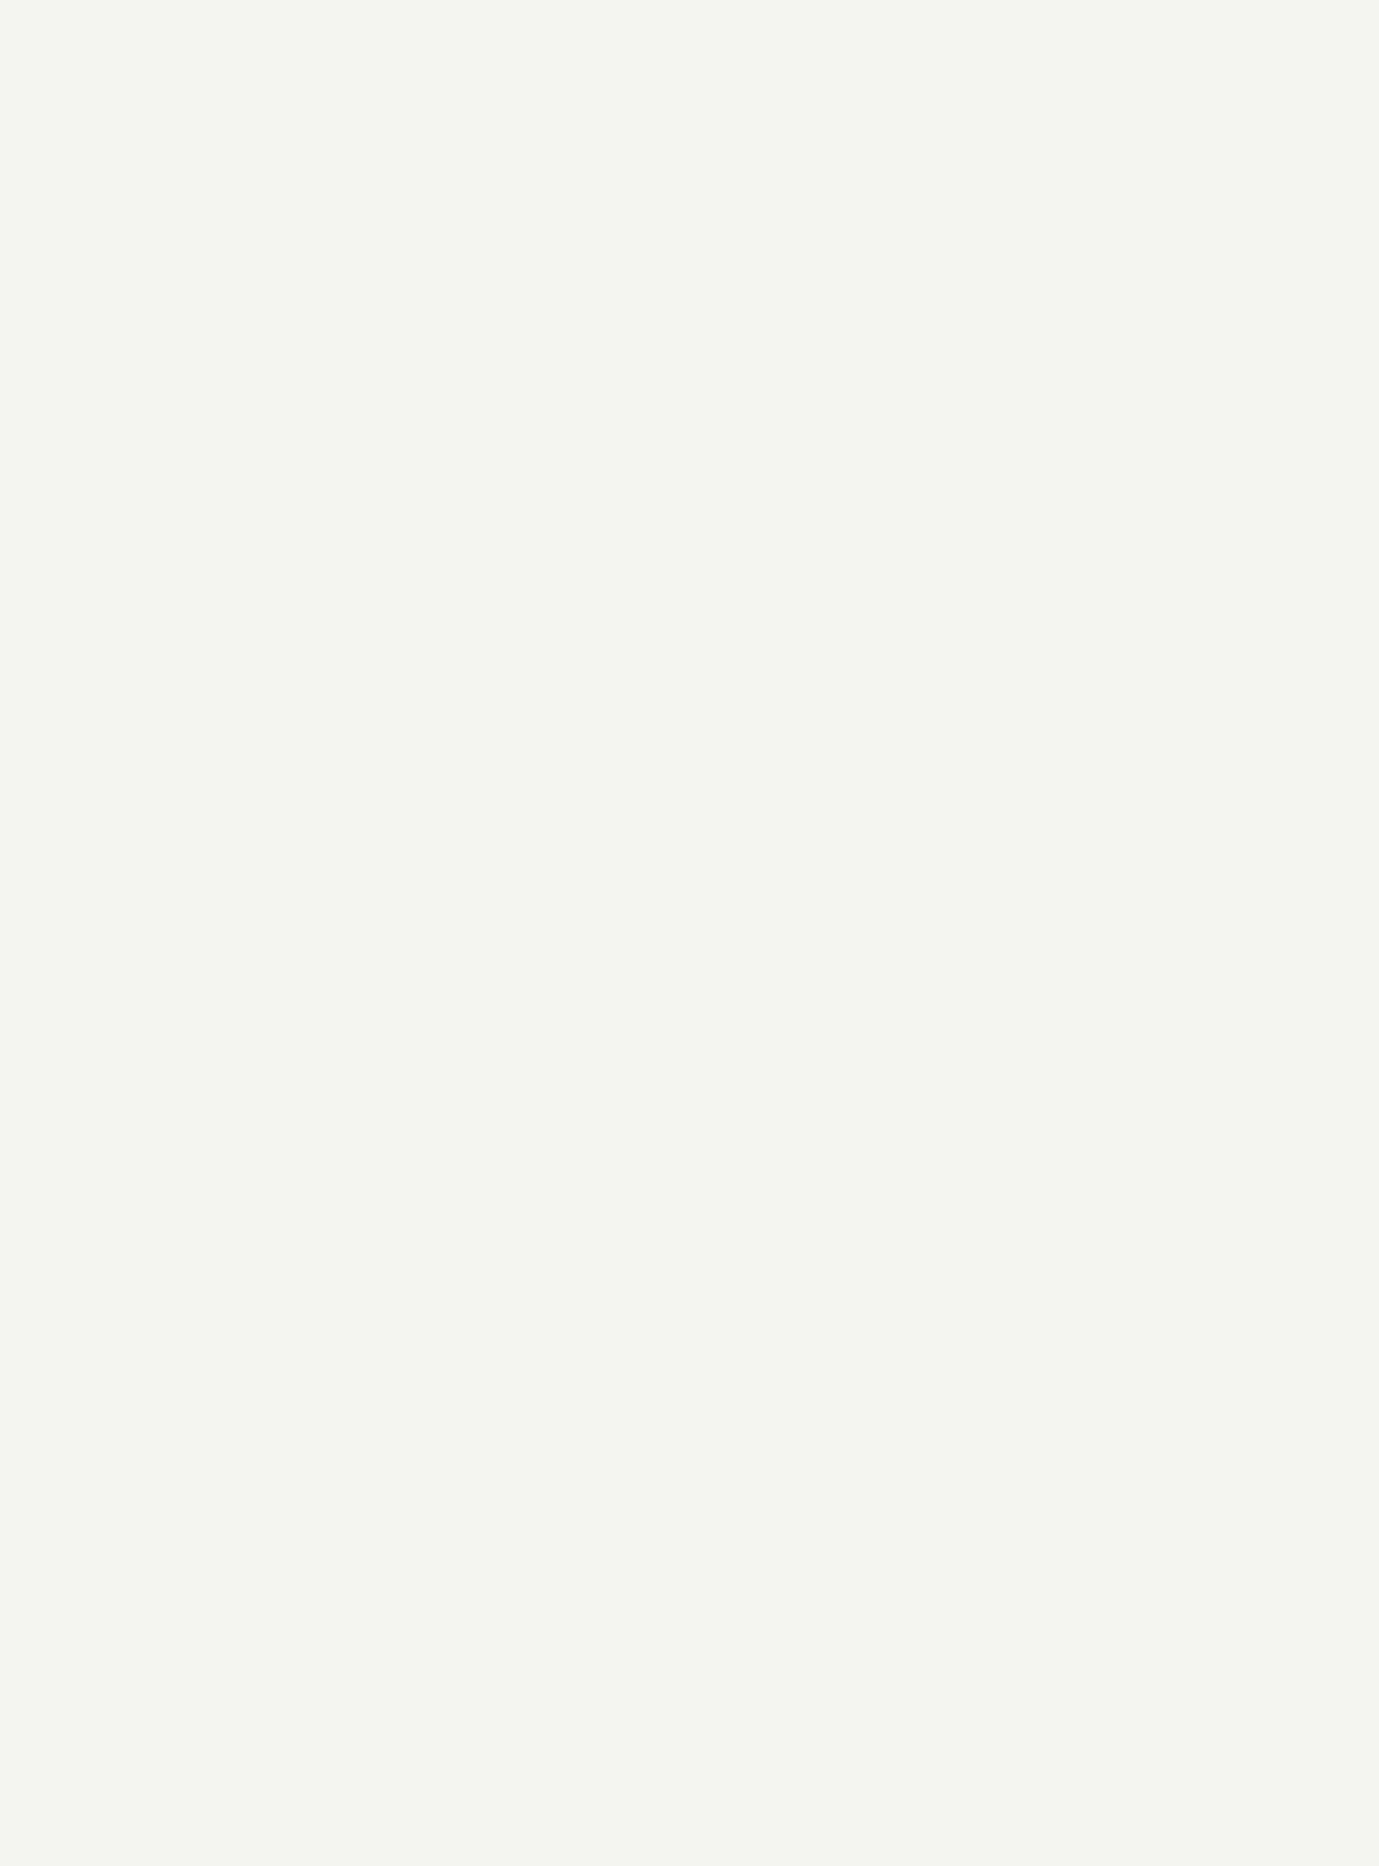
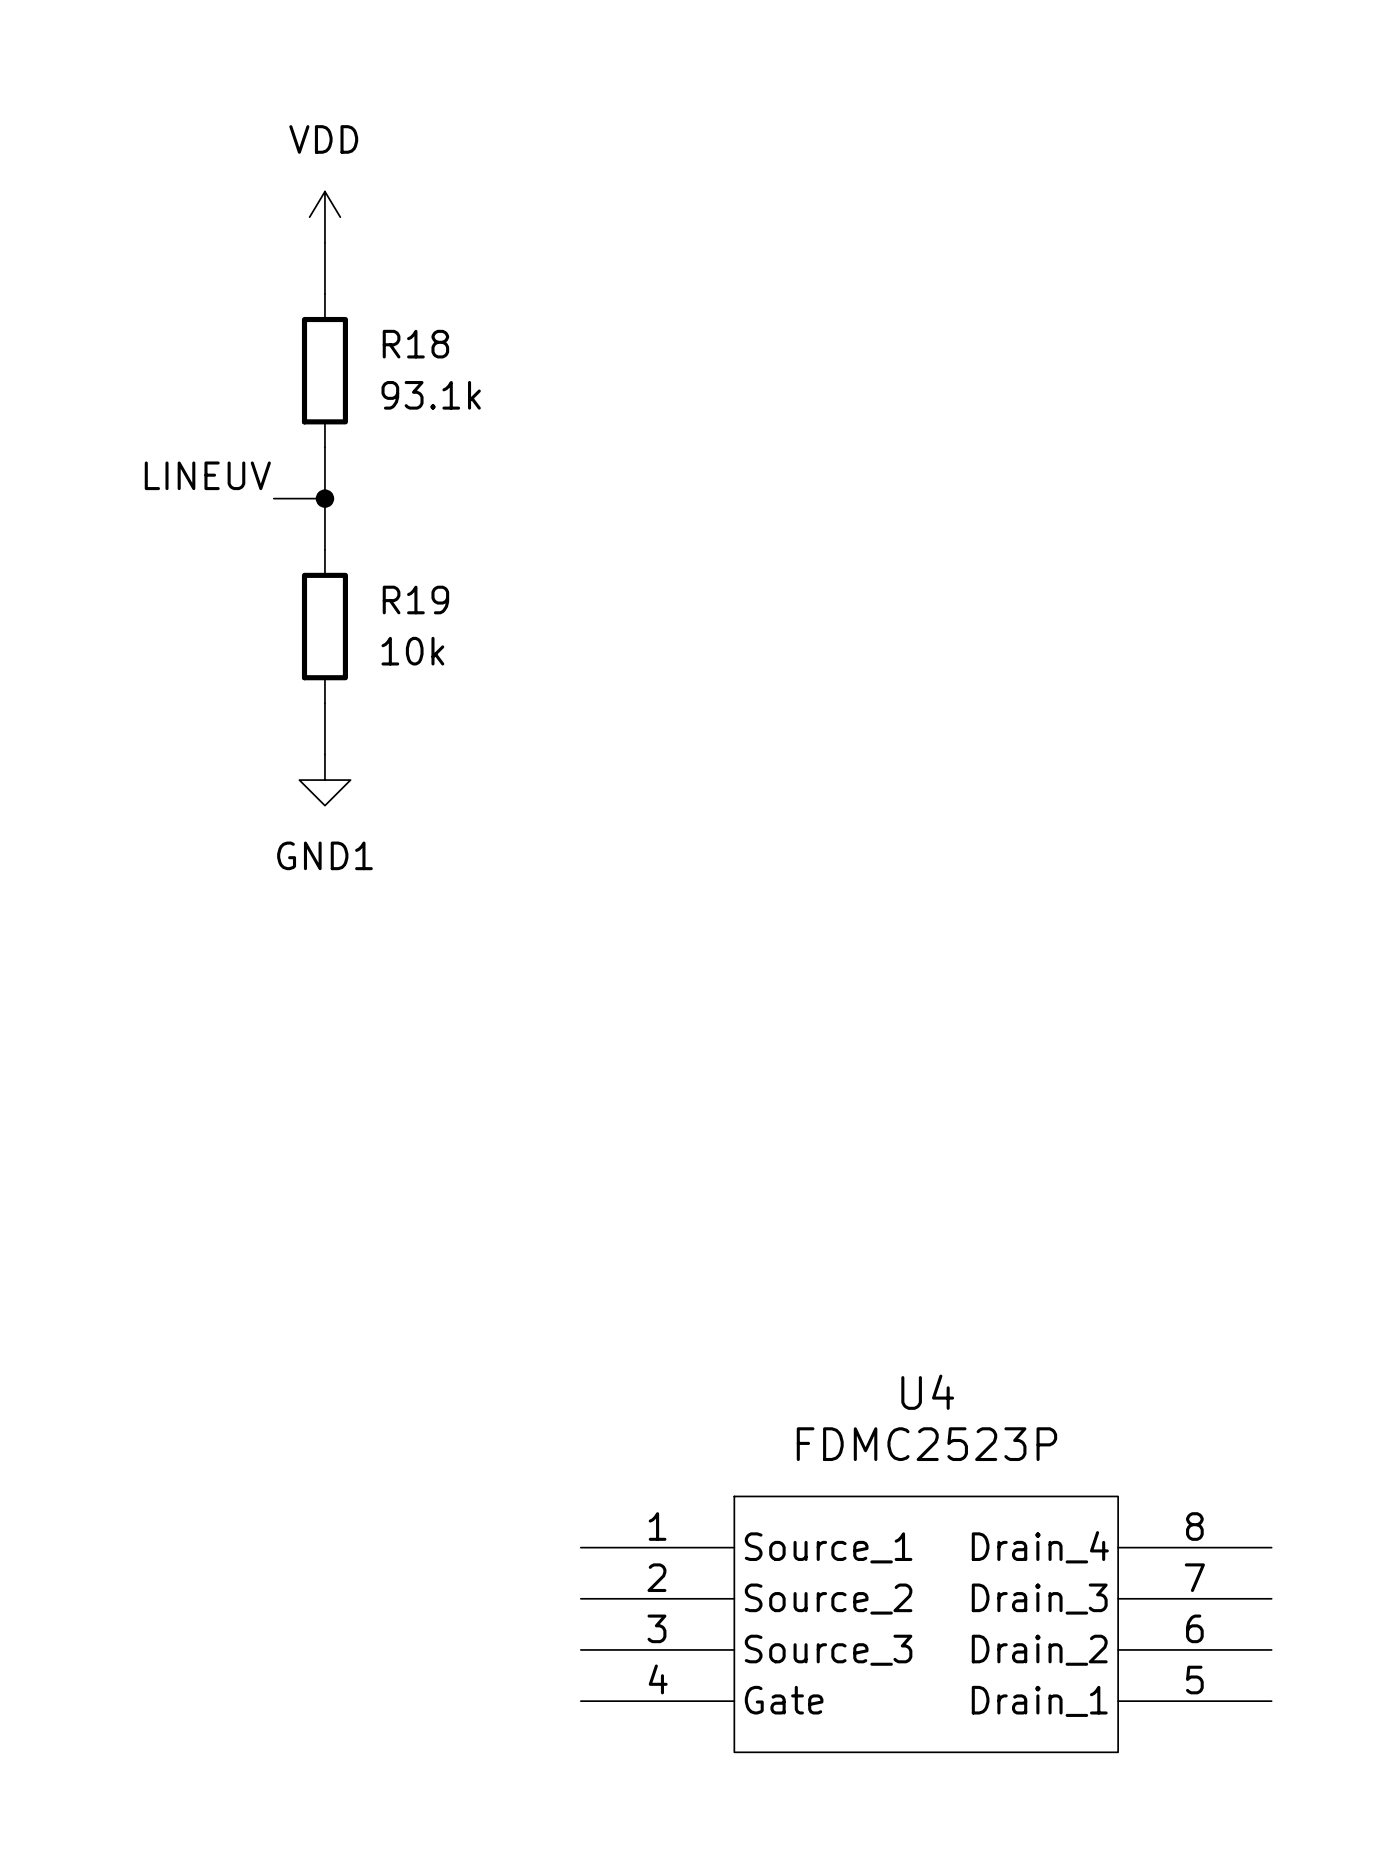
power symbol: none -> VDD (324, 217)
wire: none -> (324, 242) (324, 293)
R18: none -> 93.1k (324, 370)
wire: none -> (324, 447) (324, 549)
label: none -> LINEUV (207, 475)
wire: none -> (273, 498) (324, 498)
junction: none -> (324, 498)
R19: none -> 10k (324, 626)
wire: none -> (324, 703) (324, 754)
power symbol: none -> GND1 (324, 780)
U4: none -> FDMC2523P (926, 1624)

